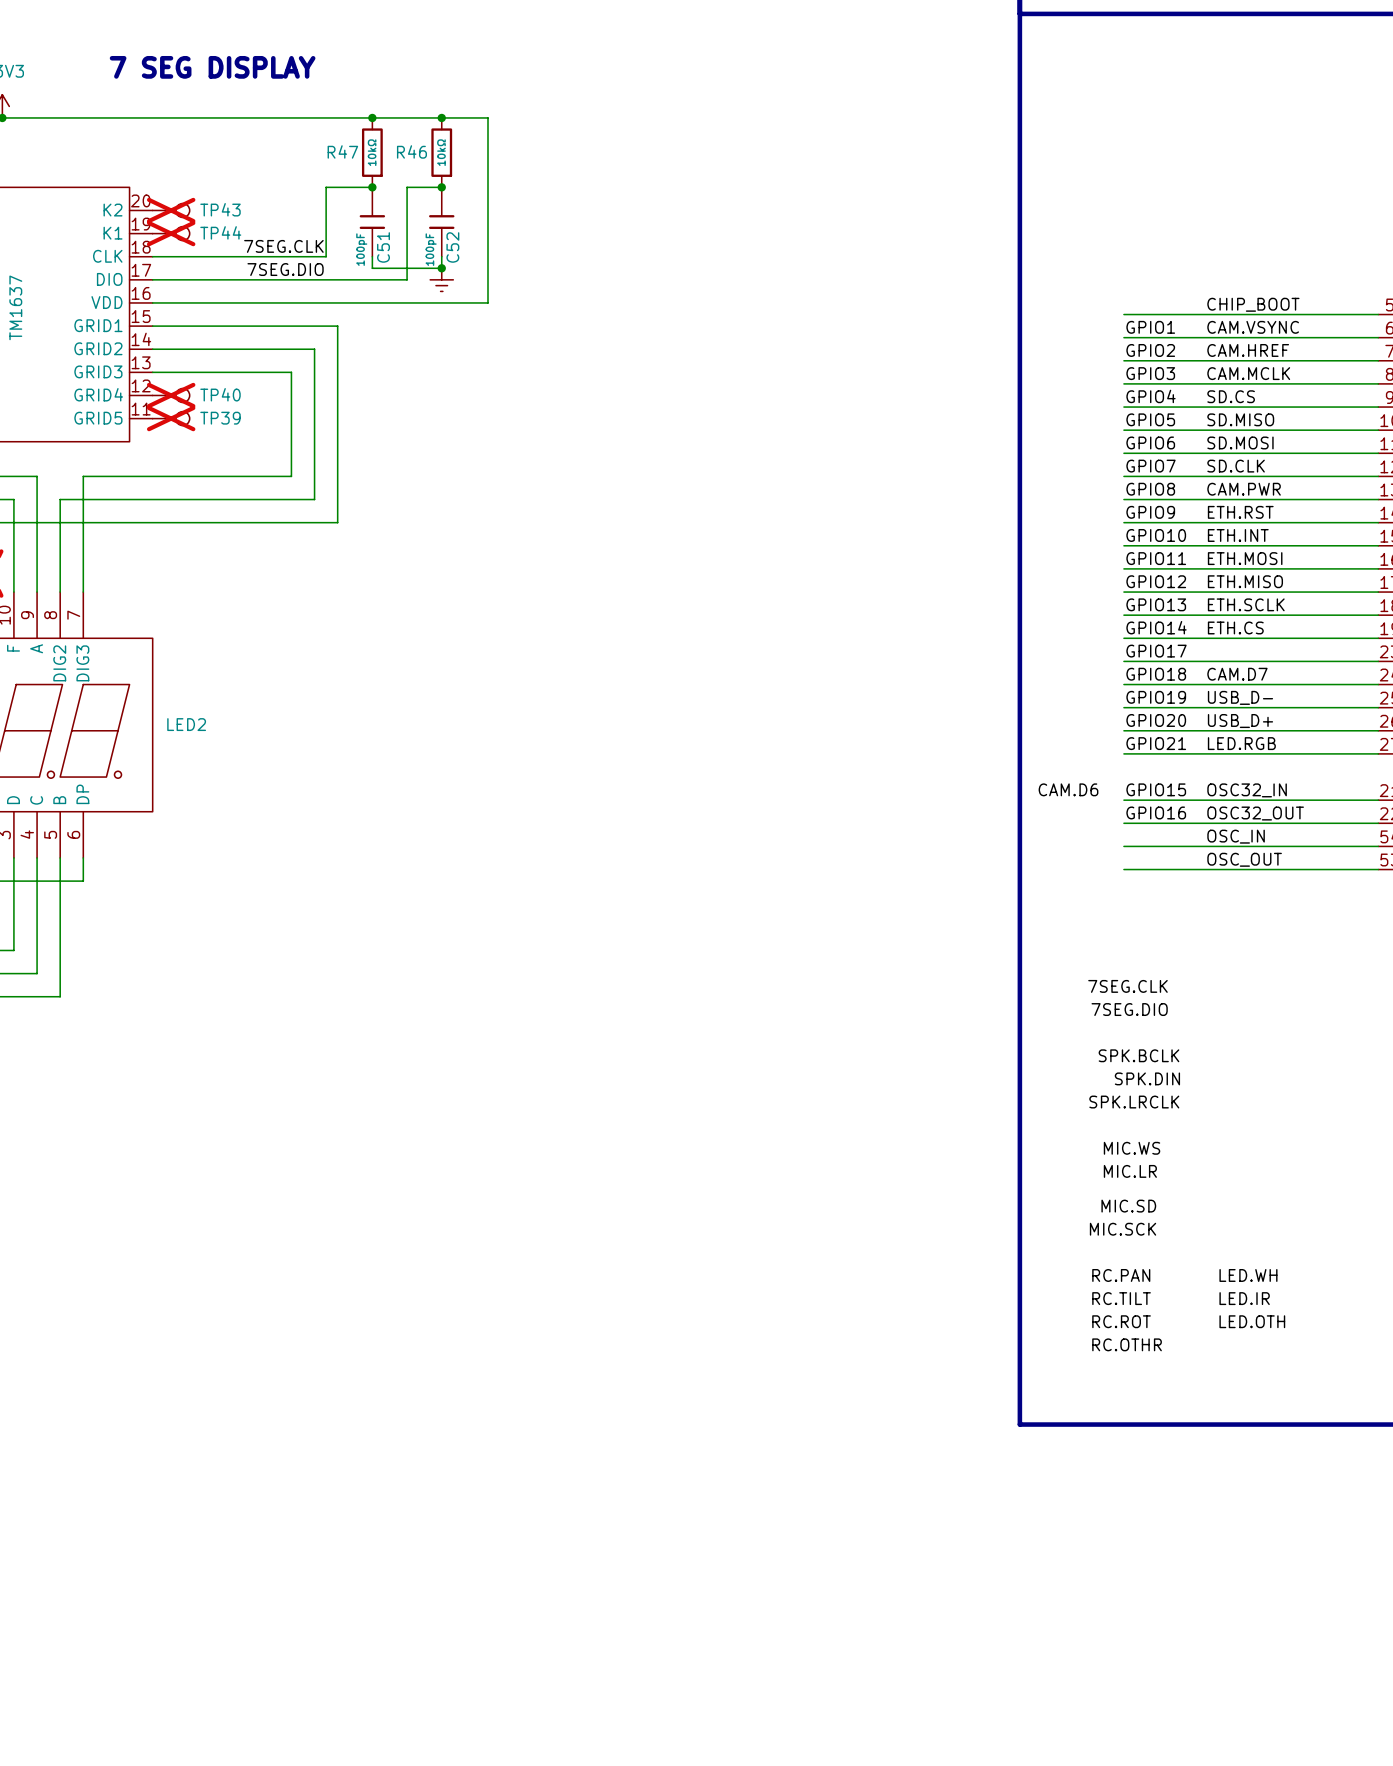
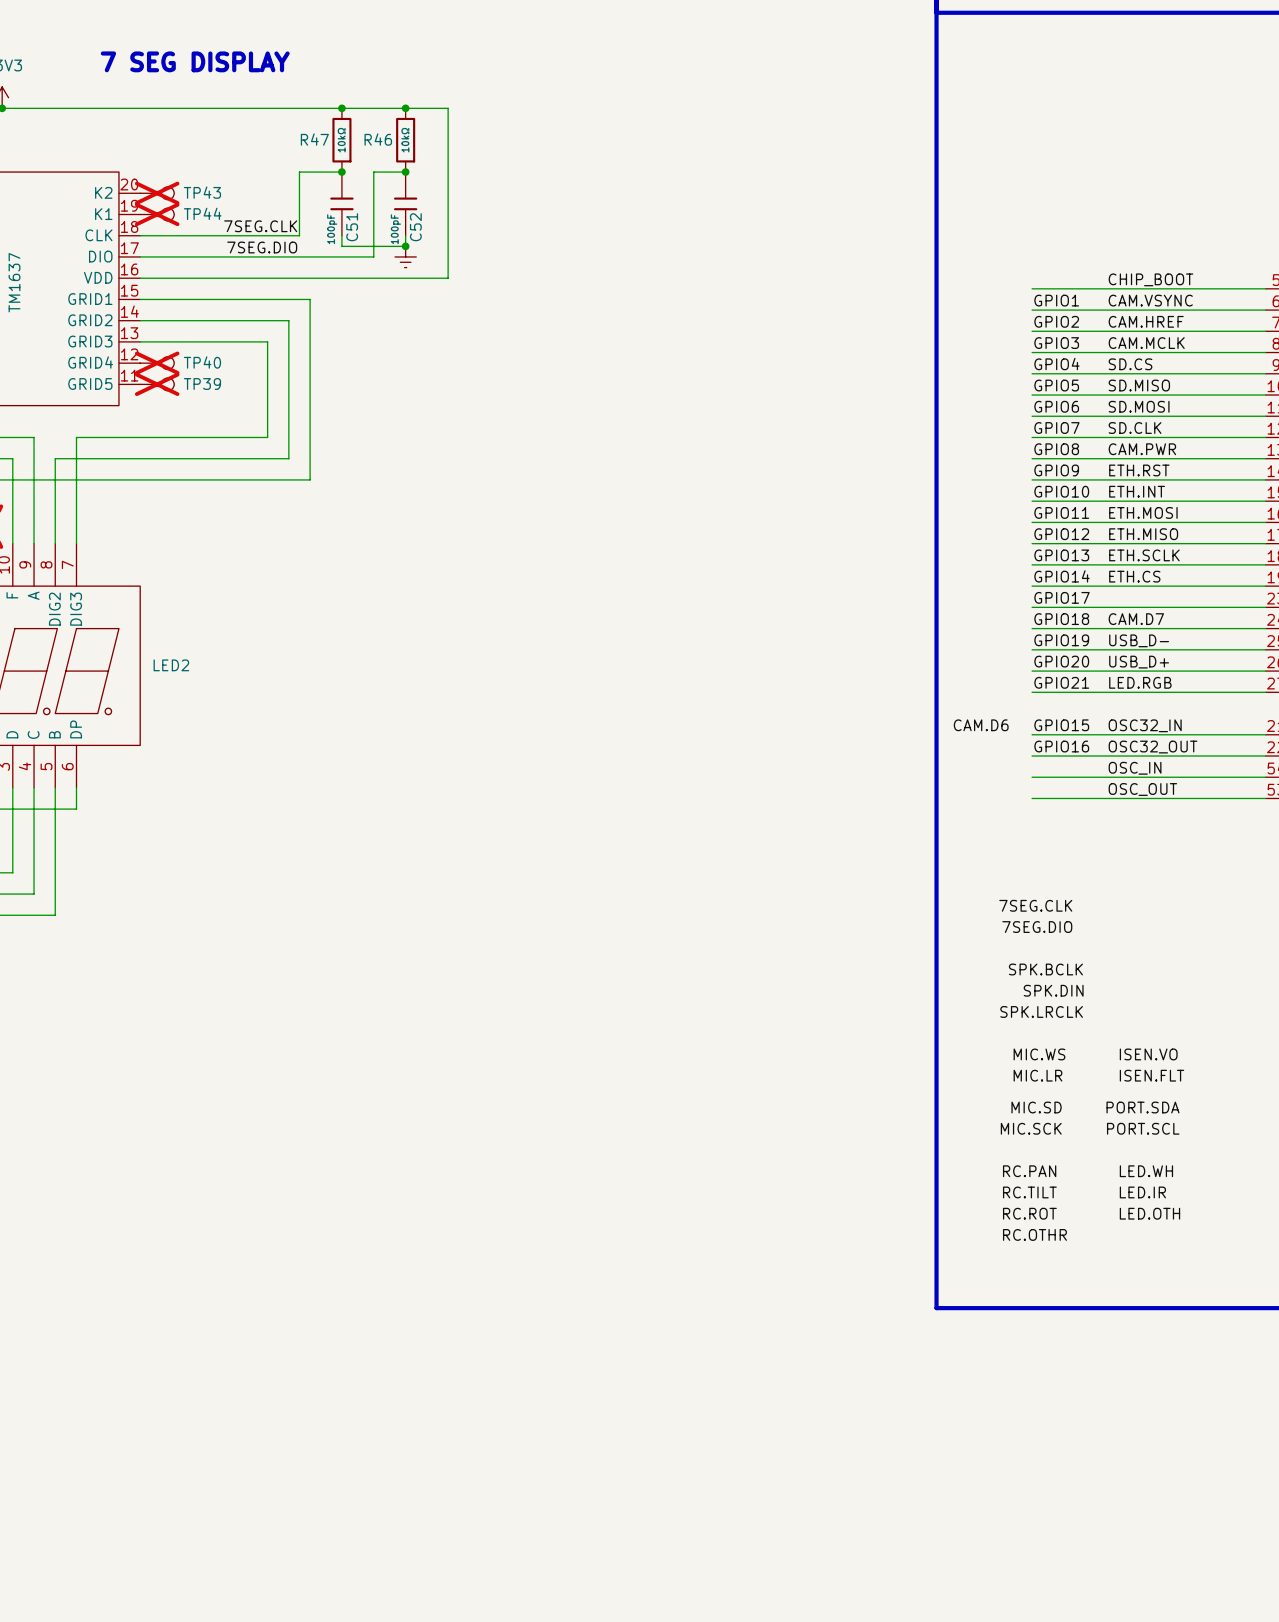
label: none -> ISEN.VO (1148, 1054)
label: none -> ISEN.FLT (1151, 1075)
label: none -> PORT.SDA (1142, 1107)
label: none -> PORT.SCL (1143, 1128)

